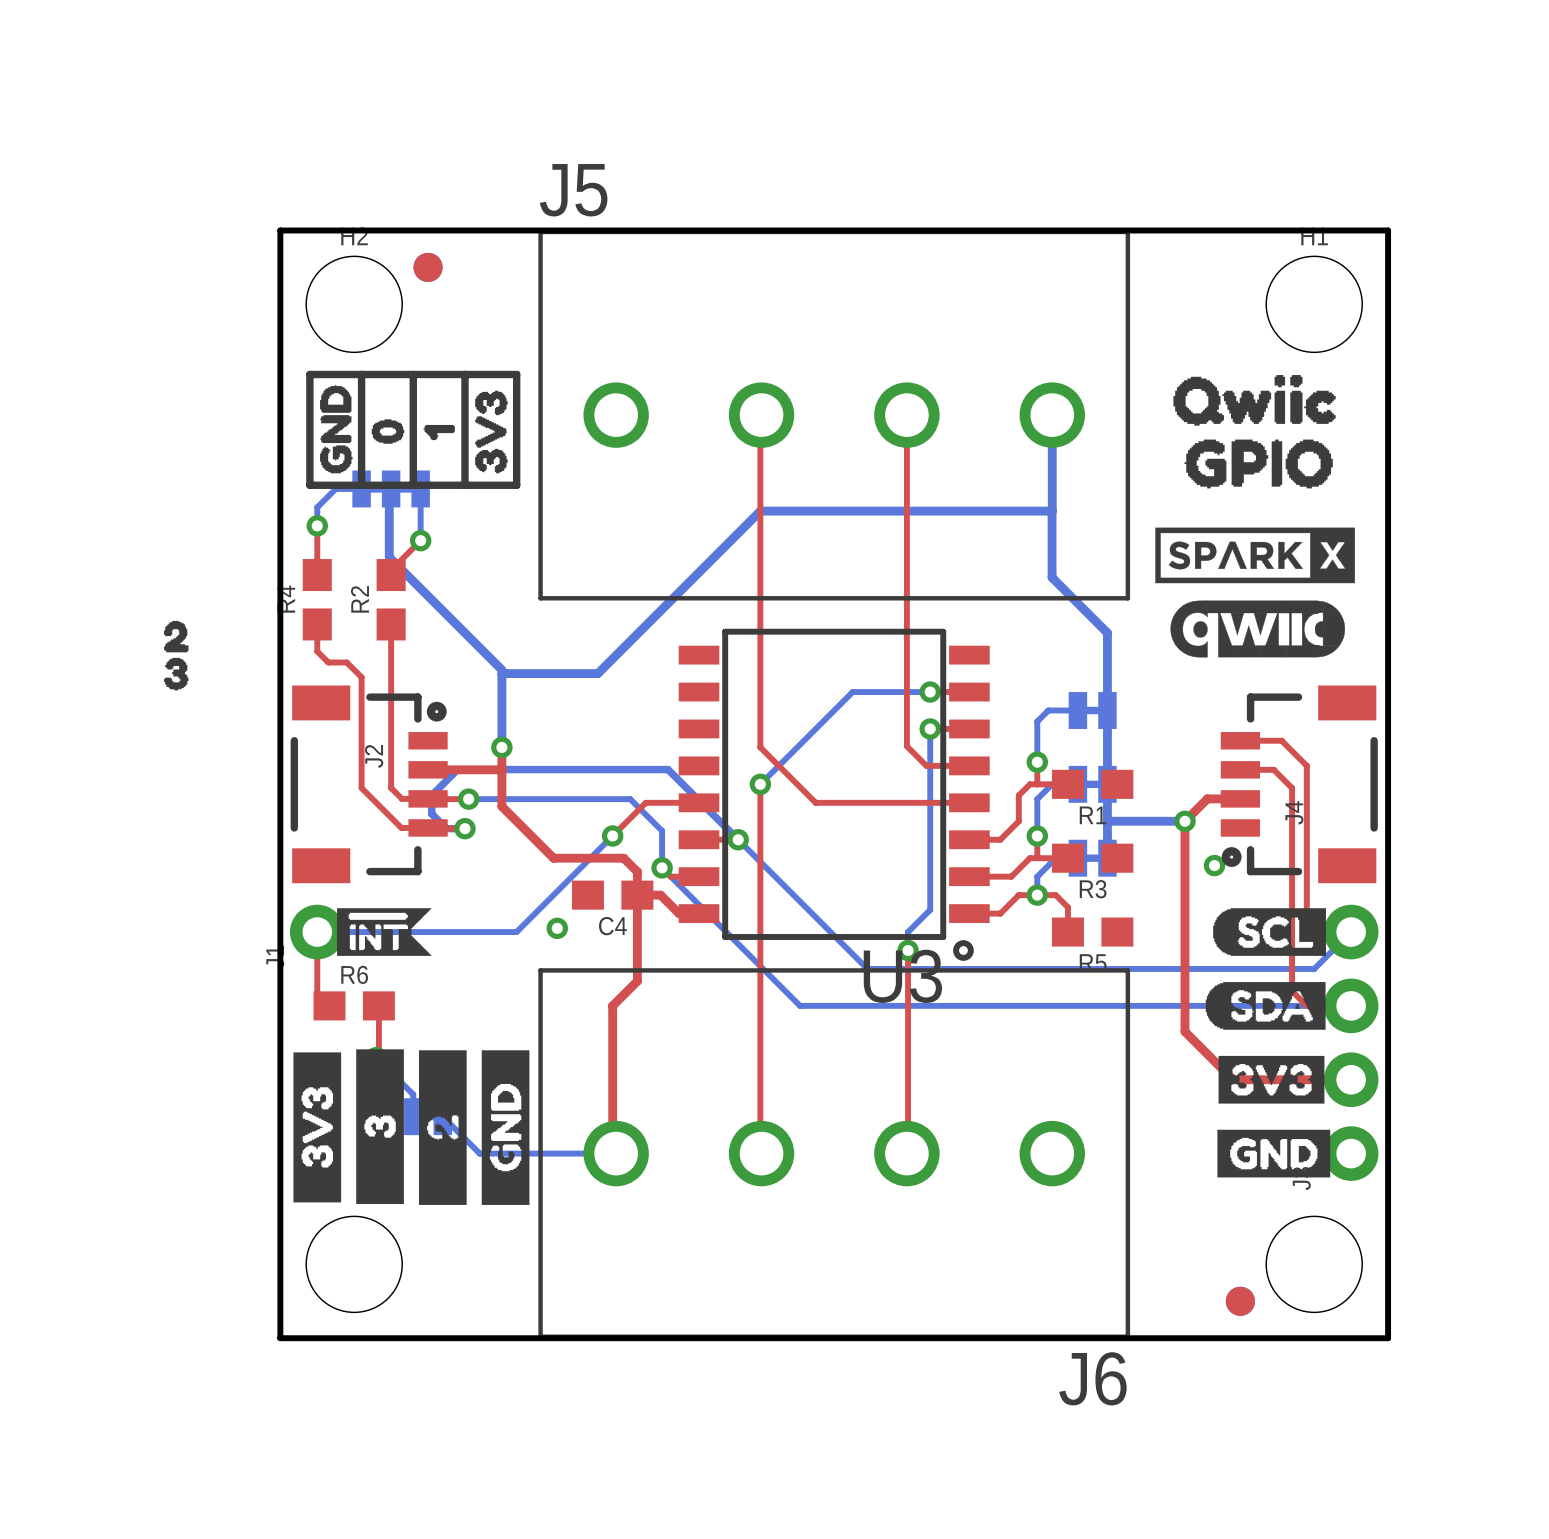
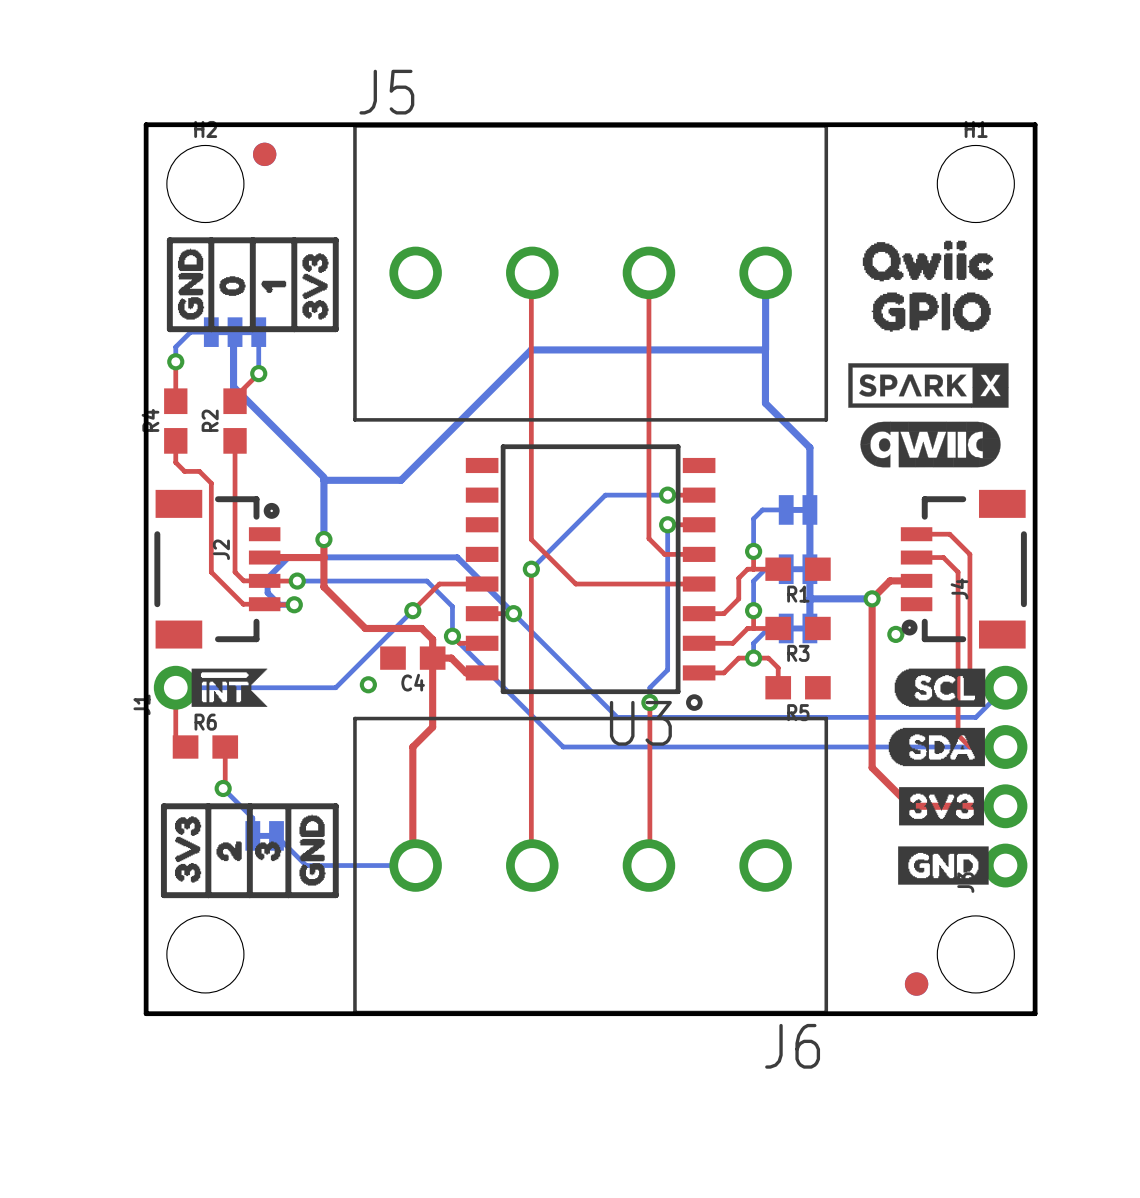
drawing: [164, 620, 189, 691] -> none
drawing shape: [356, 1049, 404, 1204] -> [216, 841, 242, 862]
drawing shape: [418, 1050, 467, 1205] -> [255, 841, 282, 862]
drawing shape: [481, 1050, 530, 1205] -> [299, 814, 326, 886]
drawing shape: [293, 1052, 342, 1203] -> [175, 816, 202, 883]
line: none -> (163, 806) (335, 806) (335, 895) (163, 895) (163, 806)
line: none -> (208, 806) (208, 895)
line: none -> (249, 806) (249, 895)
line: none -> (288, 809) (288, 895)

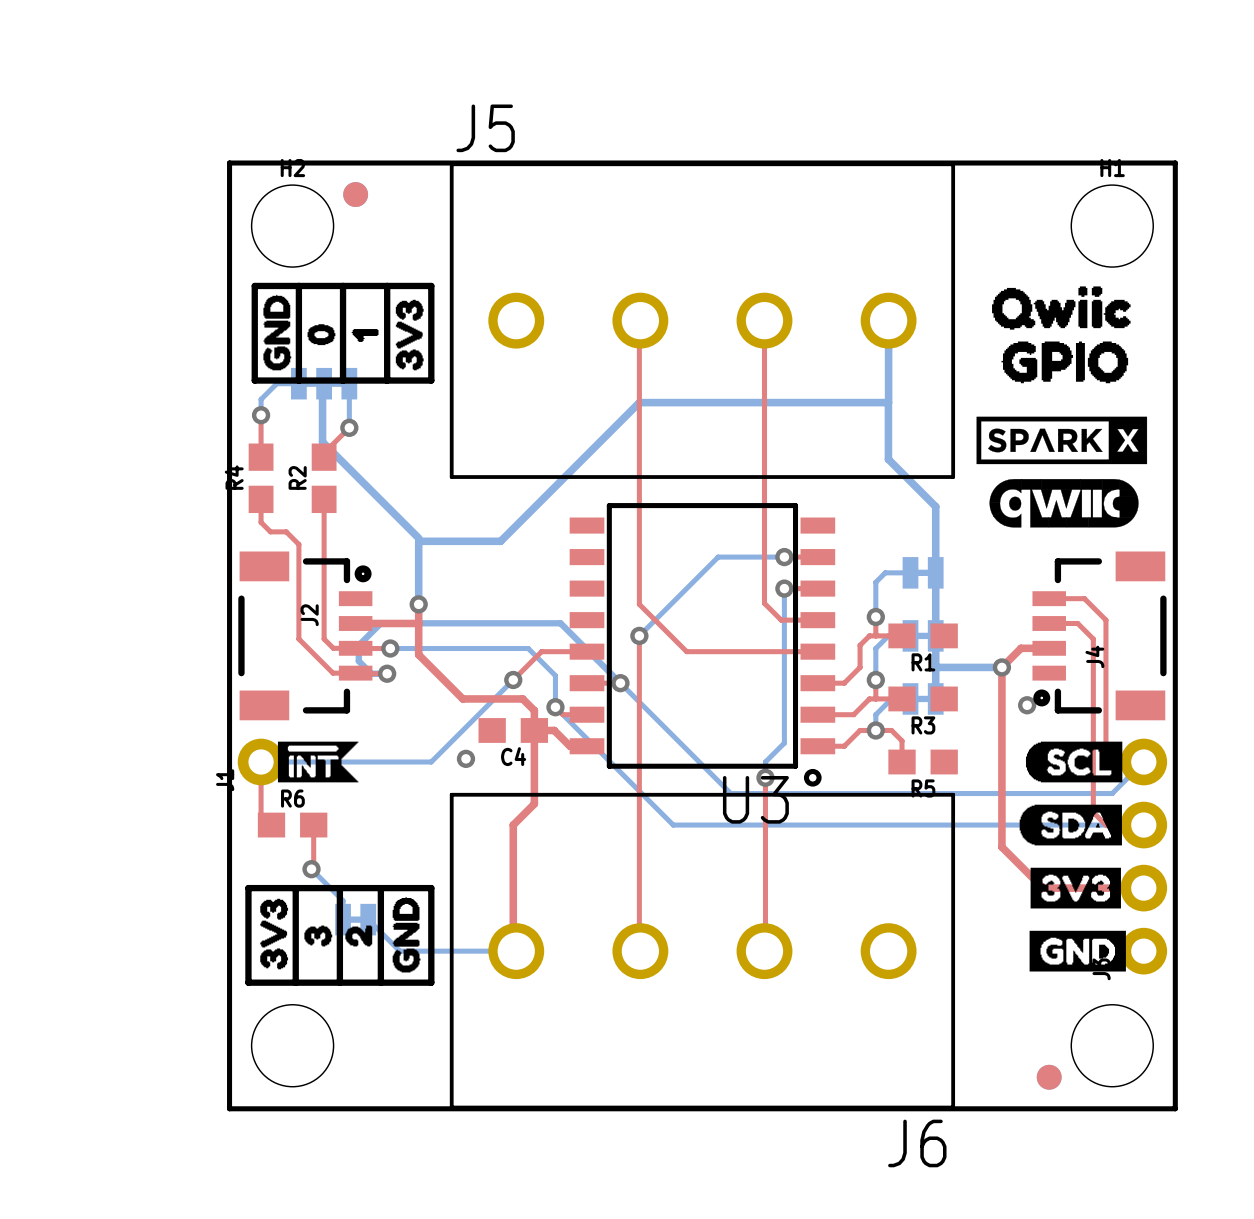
drawing position: (229, 851) -> (358, 935)
drawing position: (268, 851) -> (318, 935)

